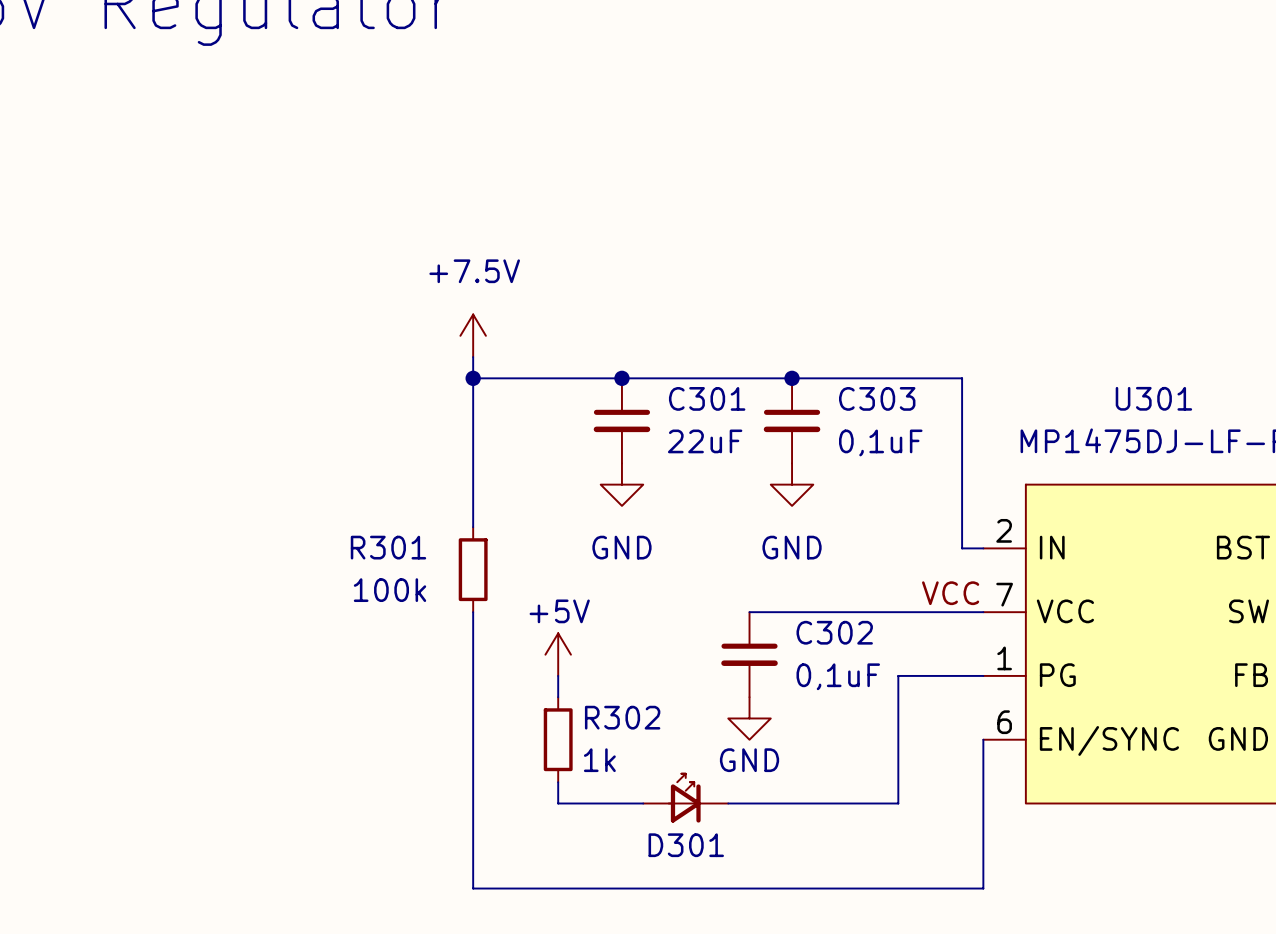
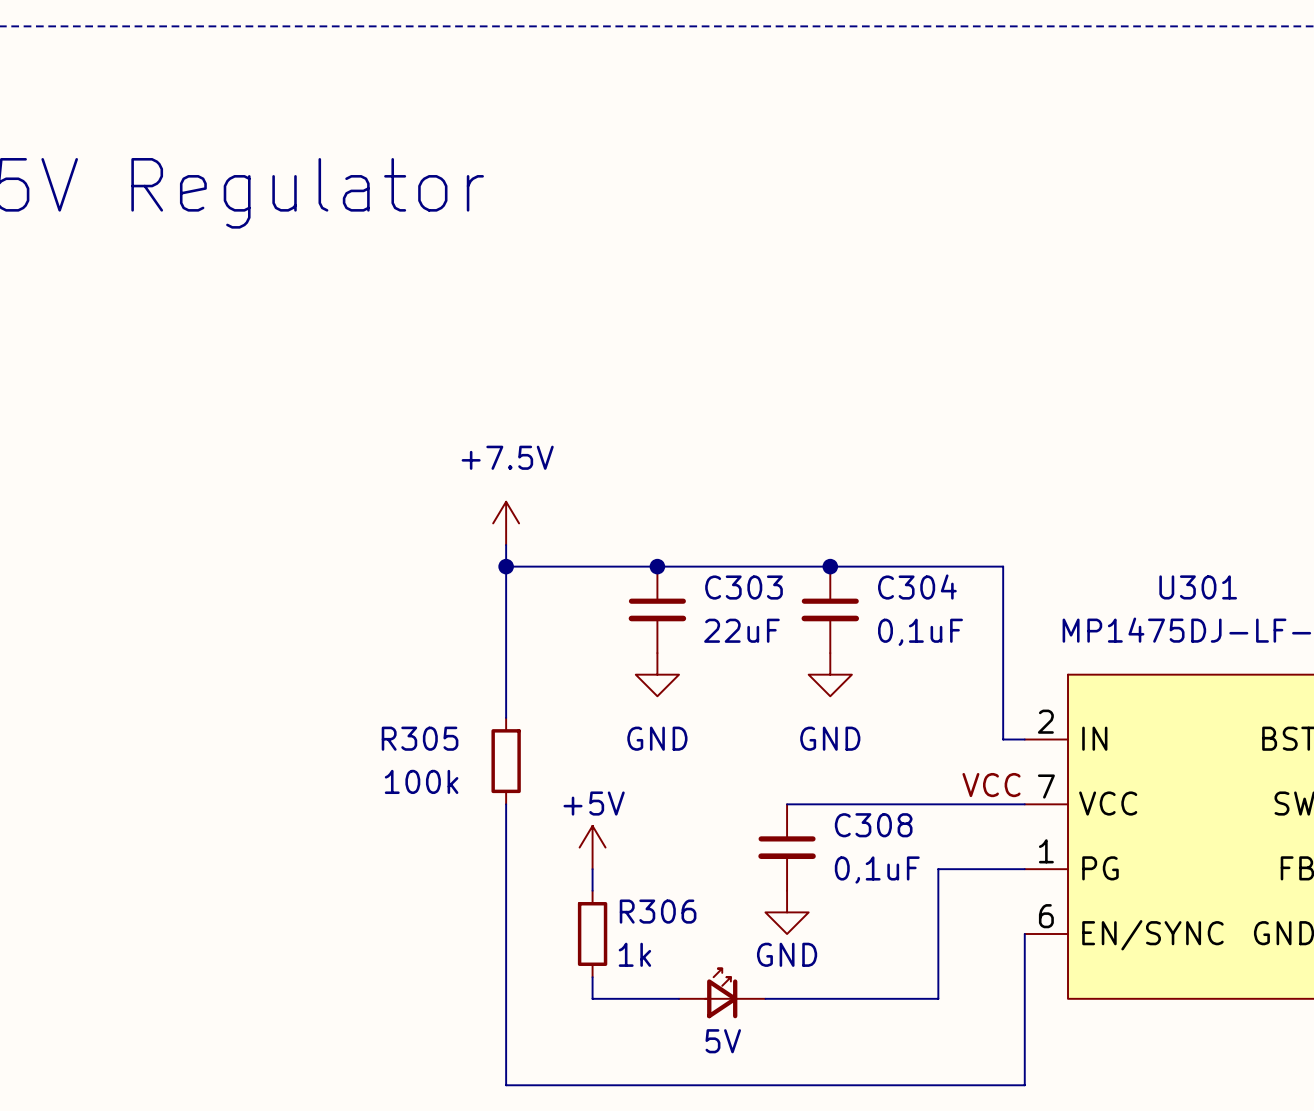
C301 name: C301 (707, 398) -> C303 (744, 587)
C303 name: C303 (877, 398) -> C304 (917, 587)
R301 name: R301 (388, 547) -> R305 (420, 738)
C302 name: C302 (834, 632) -> C308 (873, 825)
R302 name: R302 (622, 717) -> R306 (658, 911)
D301 name: D301 (686, 845) -> none
D301 value: none -> 5V (723, 1041)

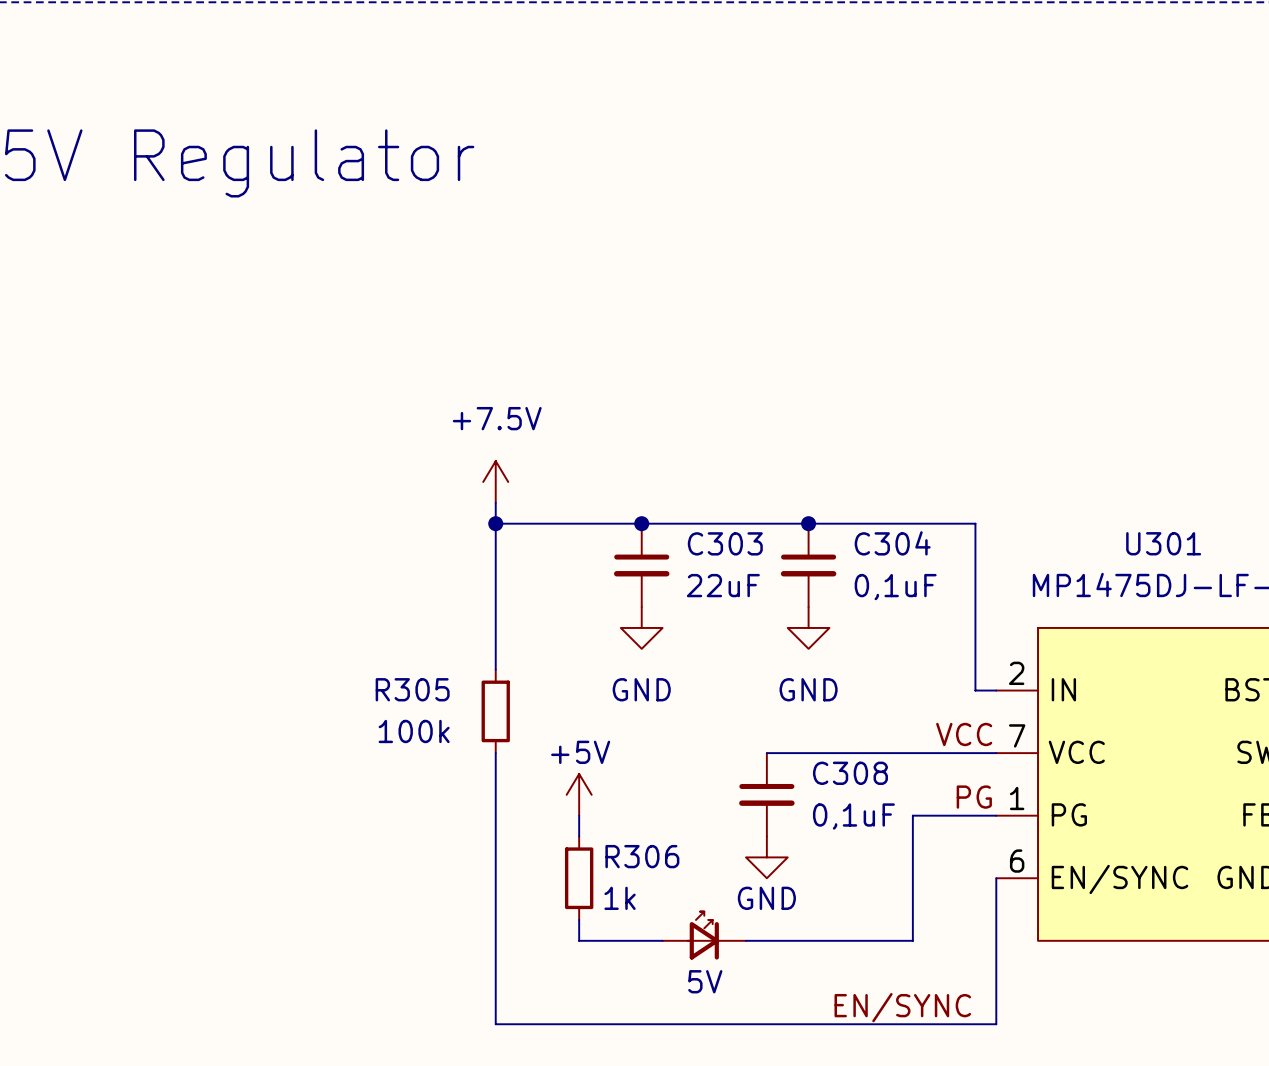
label: none -> PG (974, 797)
label: none -> EN/SYNC (902, 1007)

